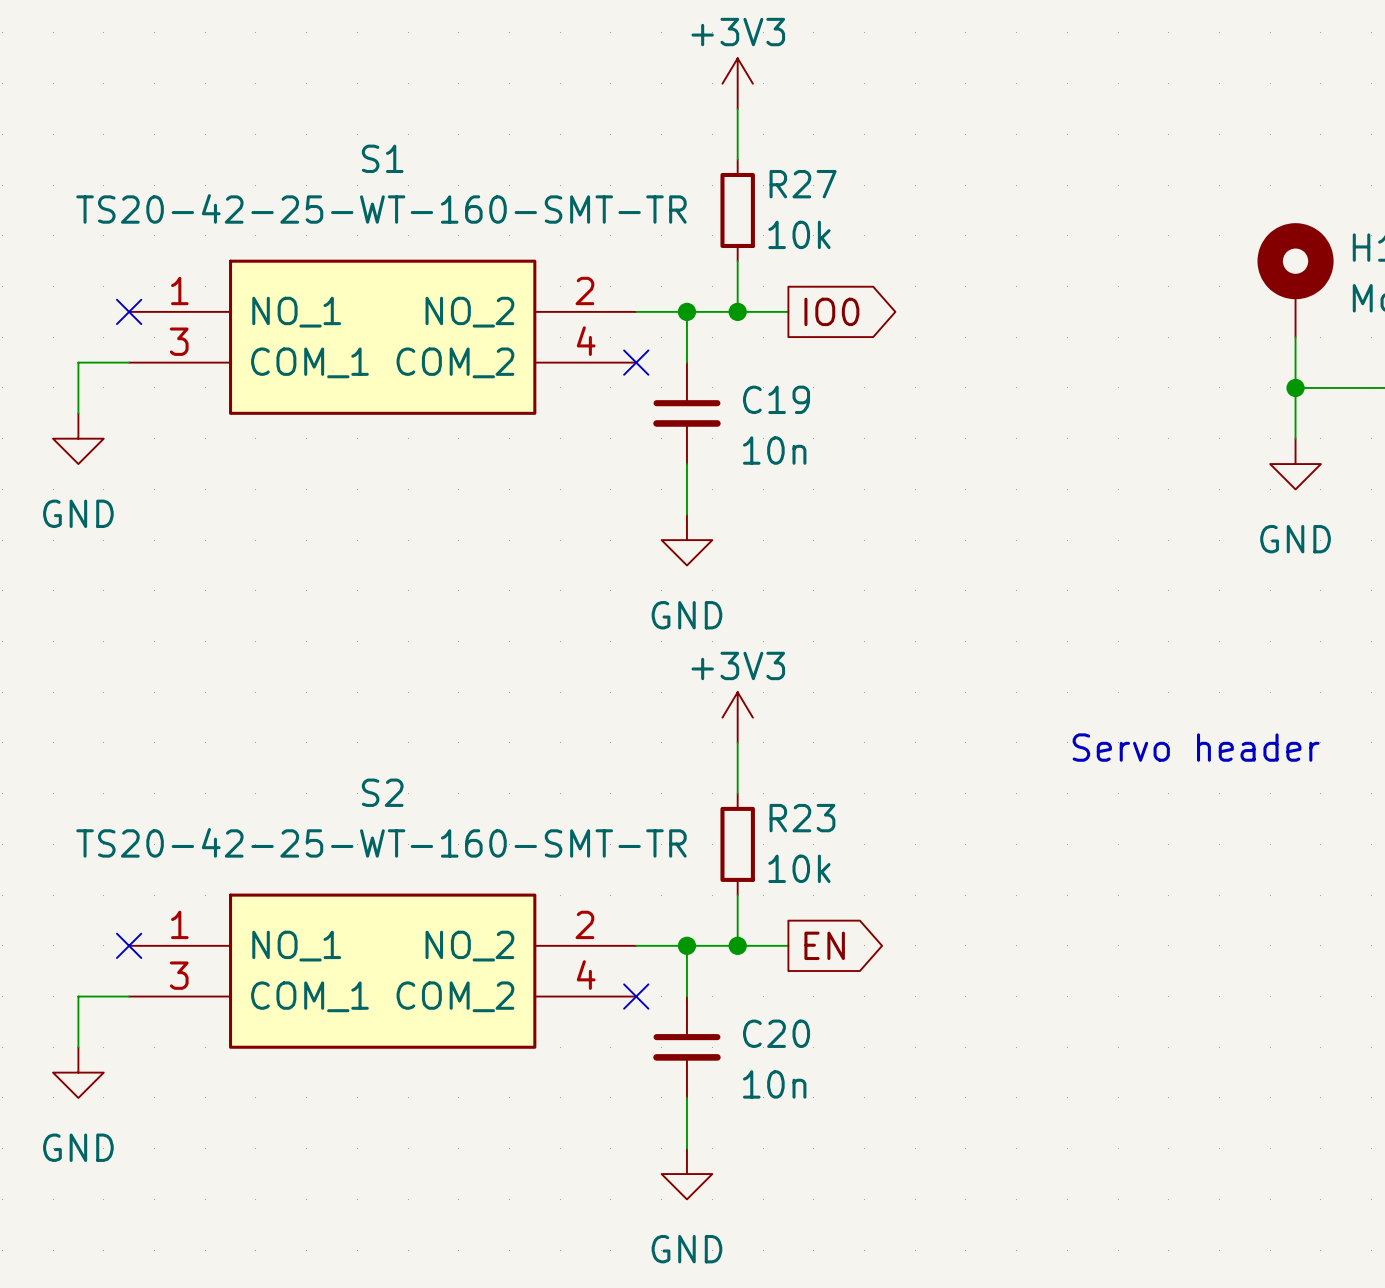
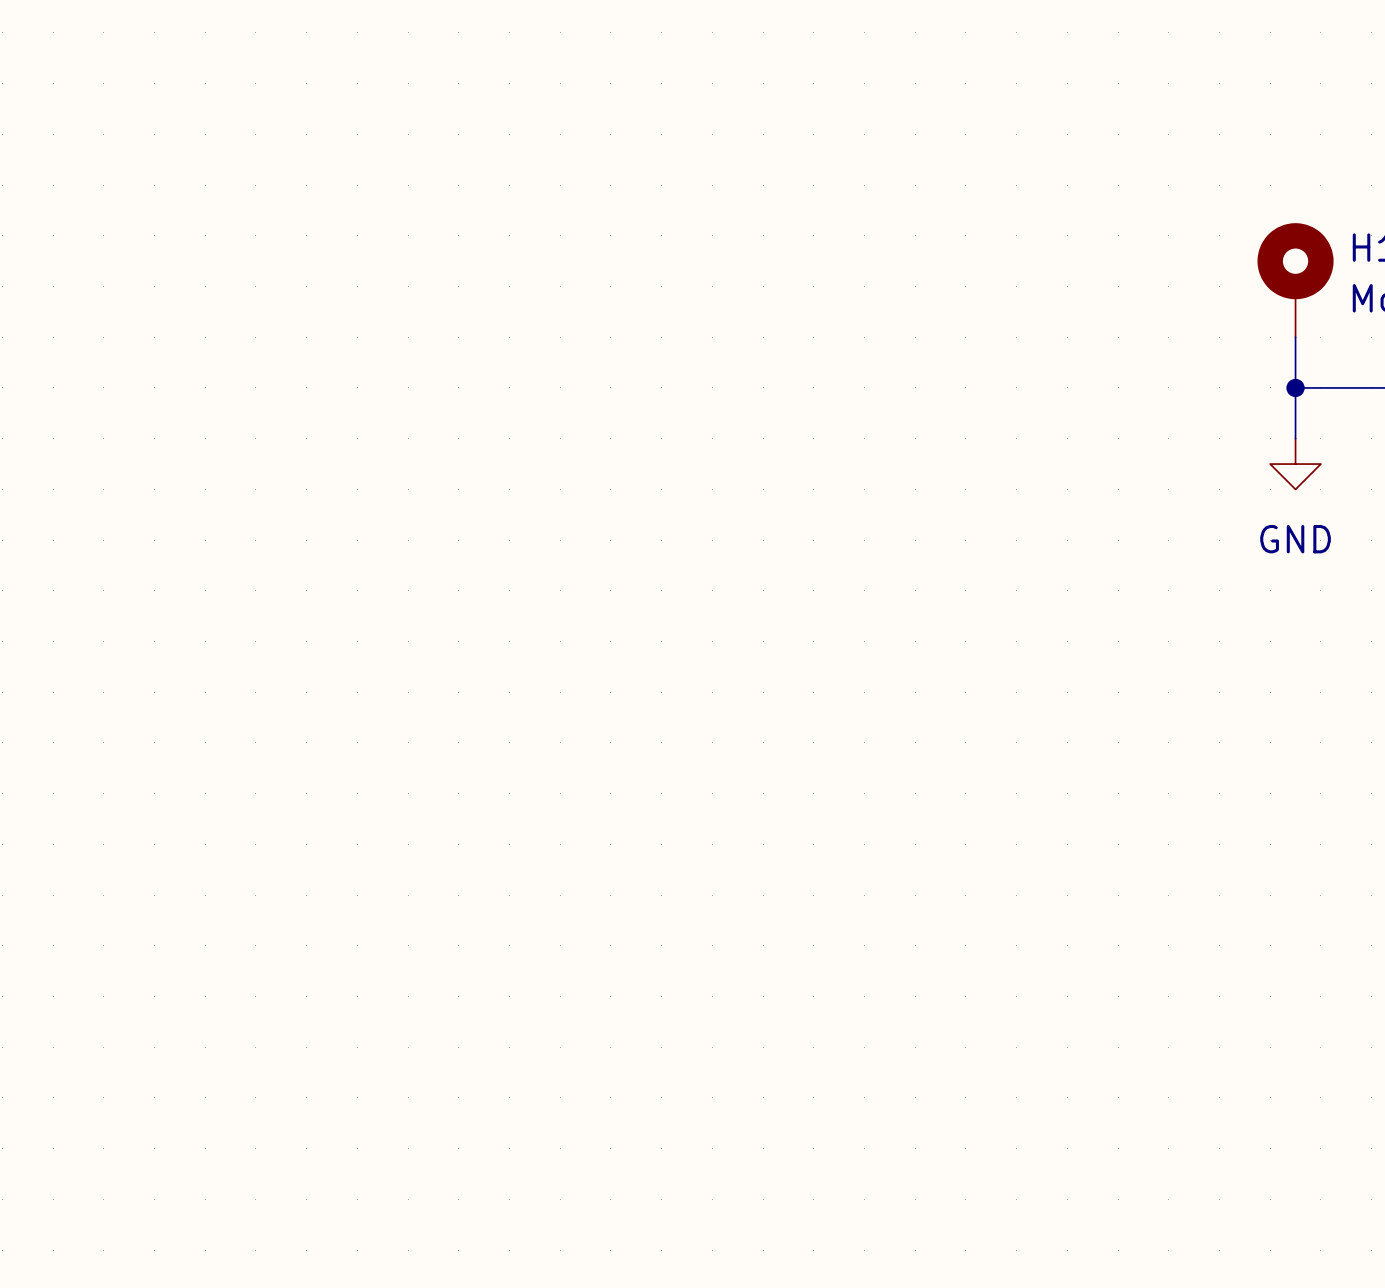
power symbol: +3V3 (737, 83) -> none
wire: (737, 109) (737, 159) -> none
R27: 10k (737, 210) -> none
wire: (737, 261) (737, 311) -> none
no-connect mark: (129, 311) -> none
wire: (636, 311) (788, 311) -> none
wire: (686, 311) (686, 362) -> none
junction: (686, 311) -> none
junction: (737, 311) -> none
global label: IO0 (831, 311) -> none
S1: TS20-42-25-WT-160-SMT-TR (382, 337) -> none
wire: (129, 362) (78, 362) (78, 413) -> none
no-connect mark: (636, 362) -> none
C19: 10n (686, 413) -> none
power symbol: GND (78, 438) -> none
wire: (686, 464) (686, 514) -> none
power symbol: GND (686, 540) -> none
power symbol: +3V3 (737, 717) -> none
wire: (737, 742) (737, 793) -> none
text: Servo header (1196, 747) -> none
R23: 10k (737, 844) -> none
wire: (737, 895) (737, 945) -> none
no-connect mark: (129, 945) -> none
wire: (636, 945) (788, 945) -> none
wire: (686, 945) (686, 996) -> none
junction: (686, 945) -> none
junction: (737, 945) -> none
global label: EN (824, 945) -> none
S2: TS20-42-25-WT-160-SMT-TR (382, 971) -> none
wire: (129, 996) (78, 996) (78, 1047) -> none
no-connect mark: (636, 996) -> none
C20: 10n (686, 1047) -> none
power symbol: GND (78, 1072) -> none
wire: (686, 1097) (686, 1148) -> none
power symbol: GND (686, 1174) -> none

